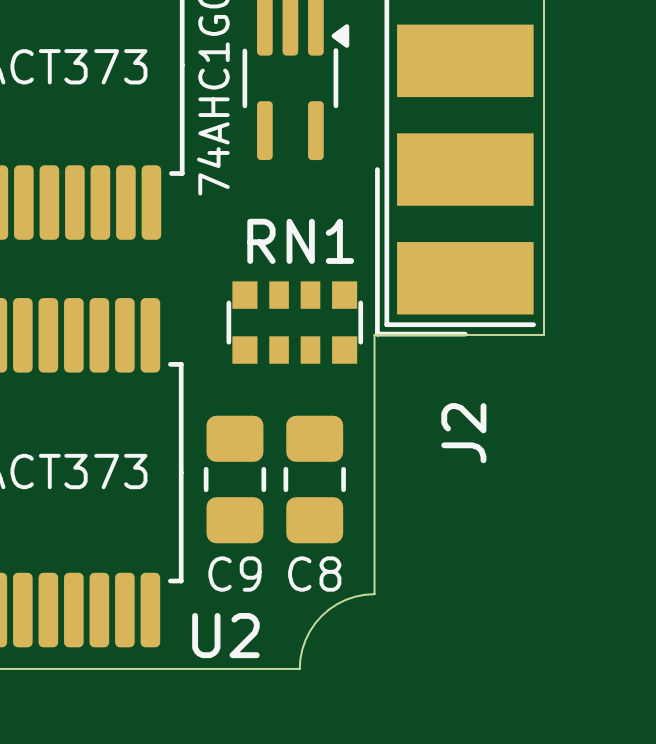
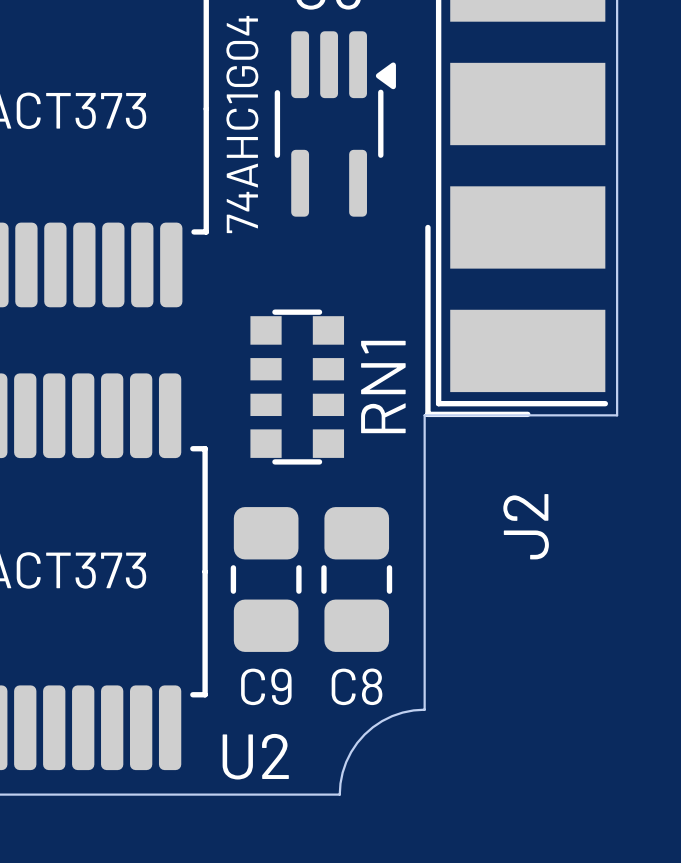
RN1 rotation: 0° (294, 322) -> 90° clockwise (297, 387)

